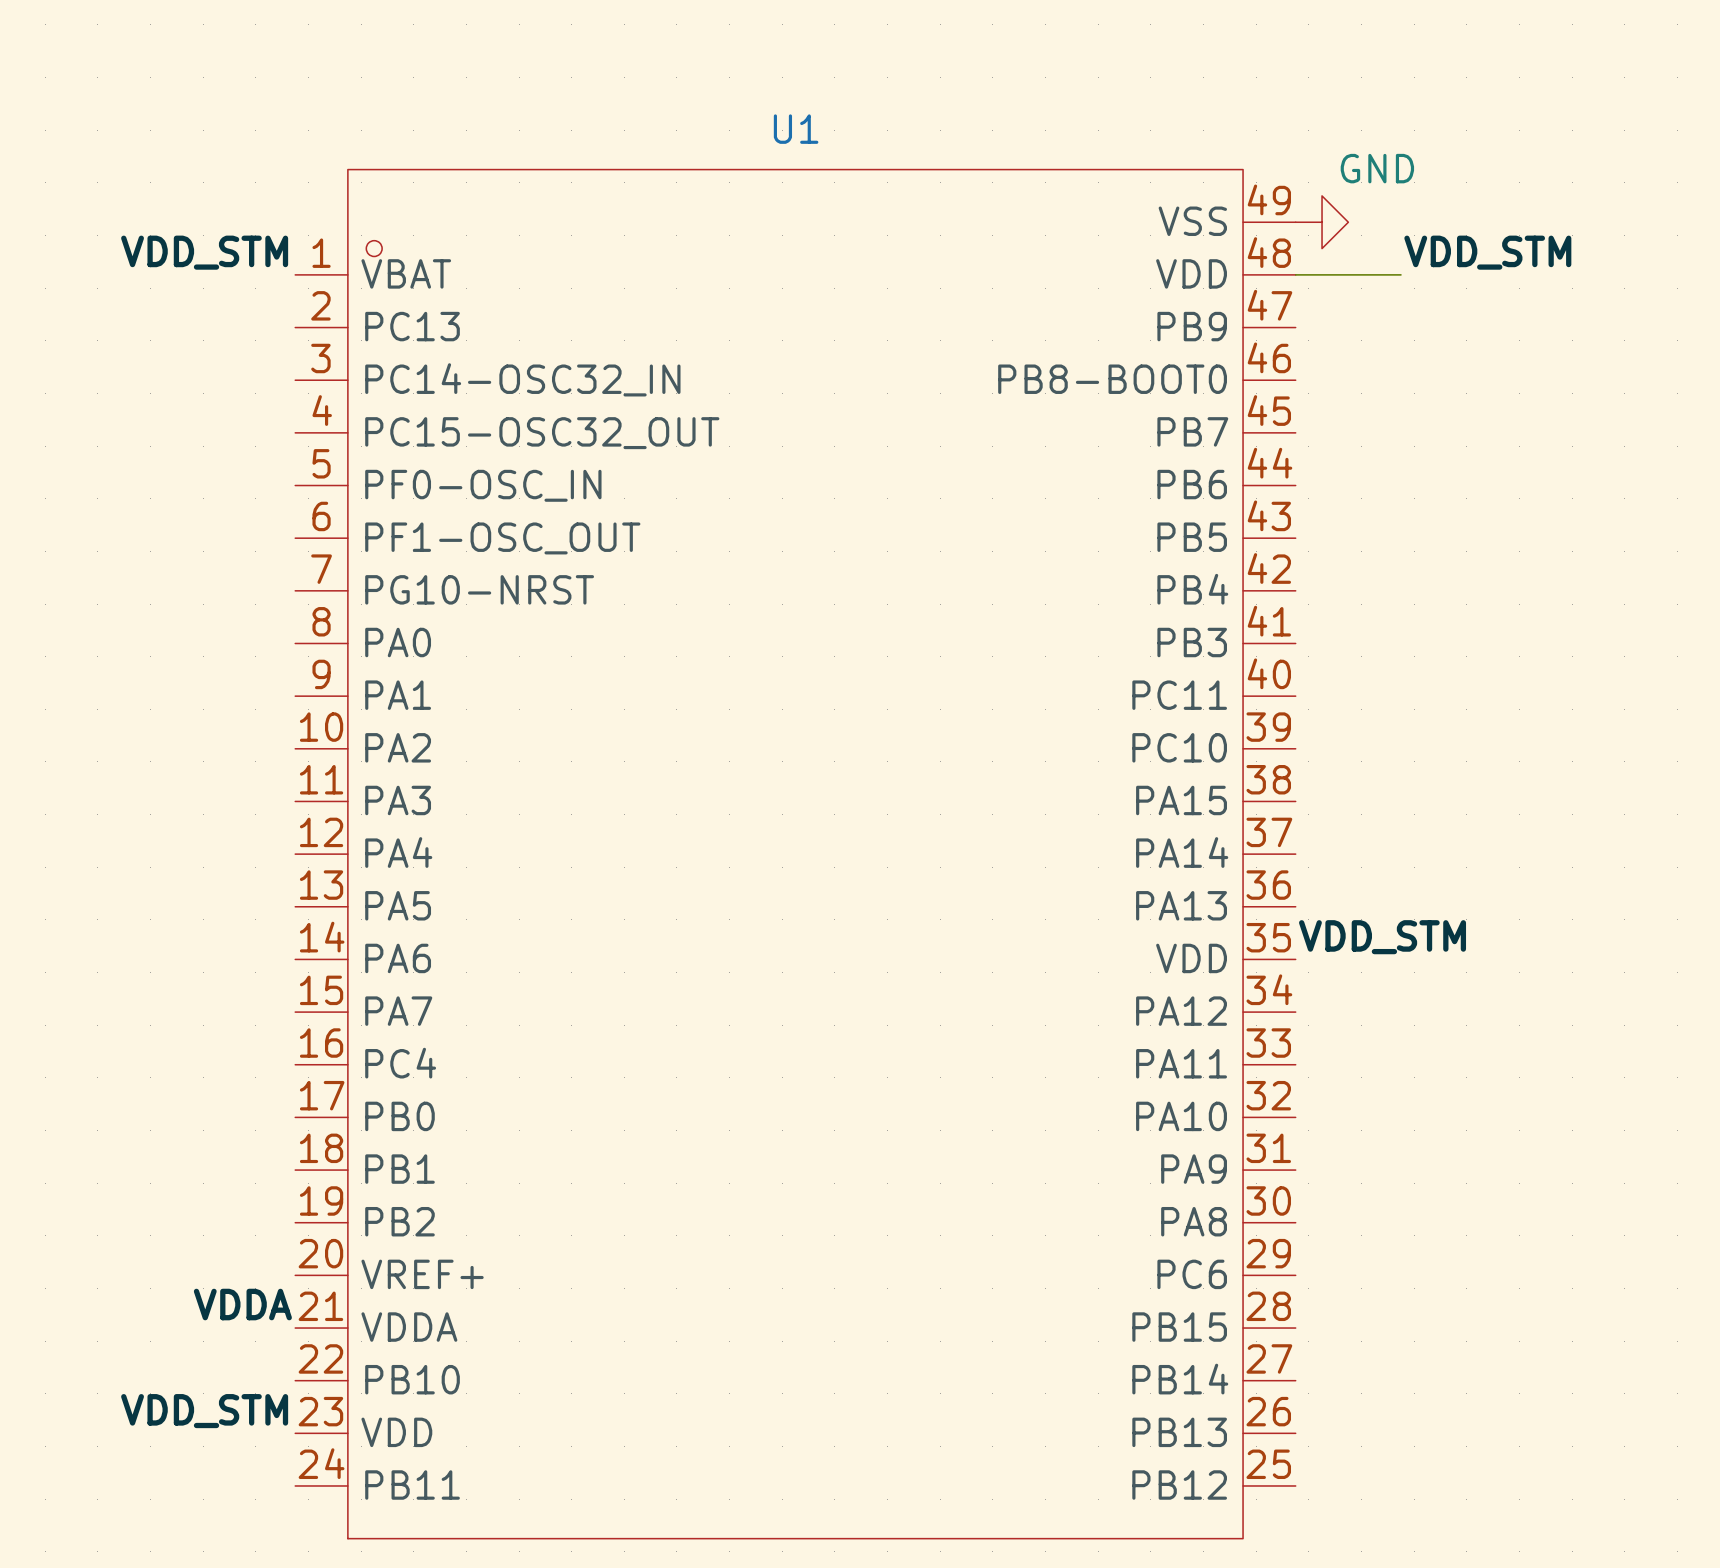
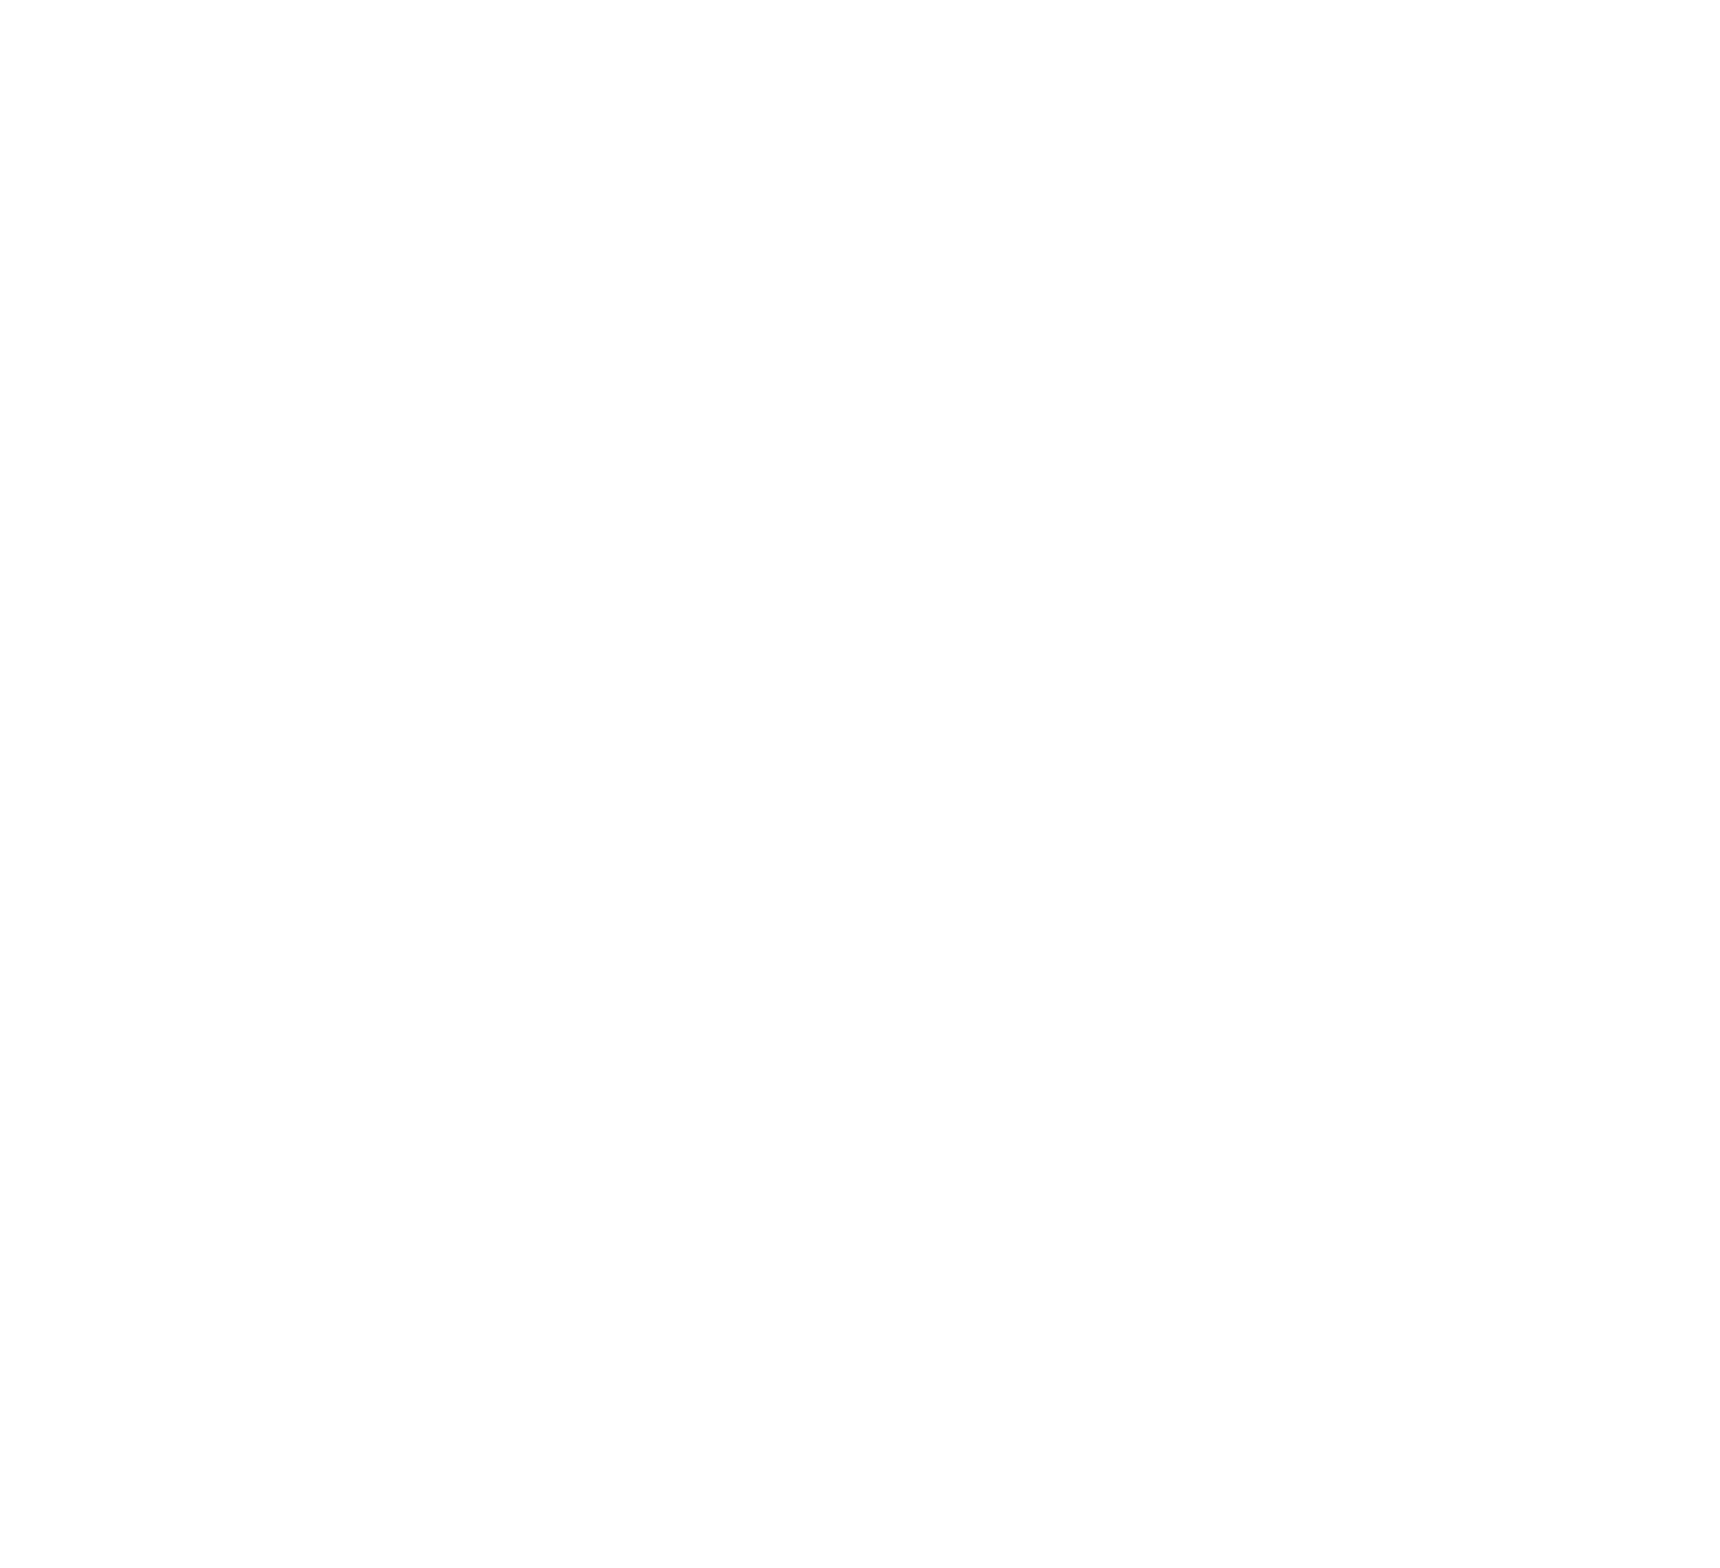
power symbol: GND (1322, 222) -> none
label: VDD_STM (204, 252) -> none
label: VDD_STM (1487, 252) -> none
wire: (1295, 274) (1401, 274) -> none
U1: (795, 854) -> none
label: VDD_STM (1382, 937) -> none
label: VDDA (242, 1304) -> none
label: VDD_STM (204, 1411) -> none

